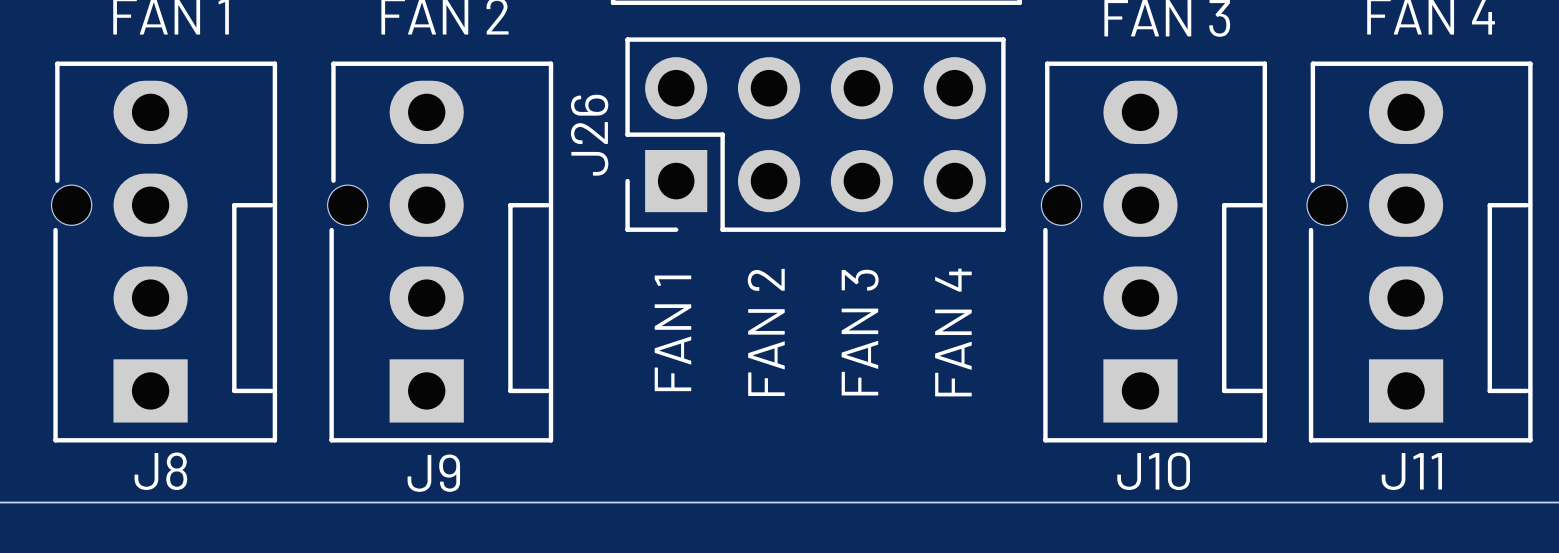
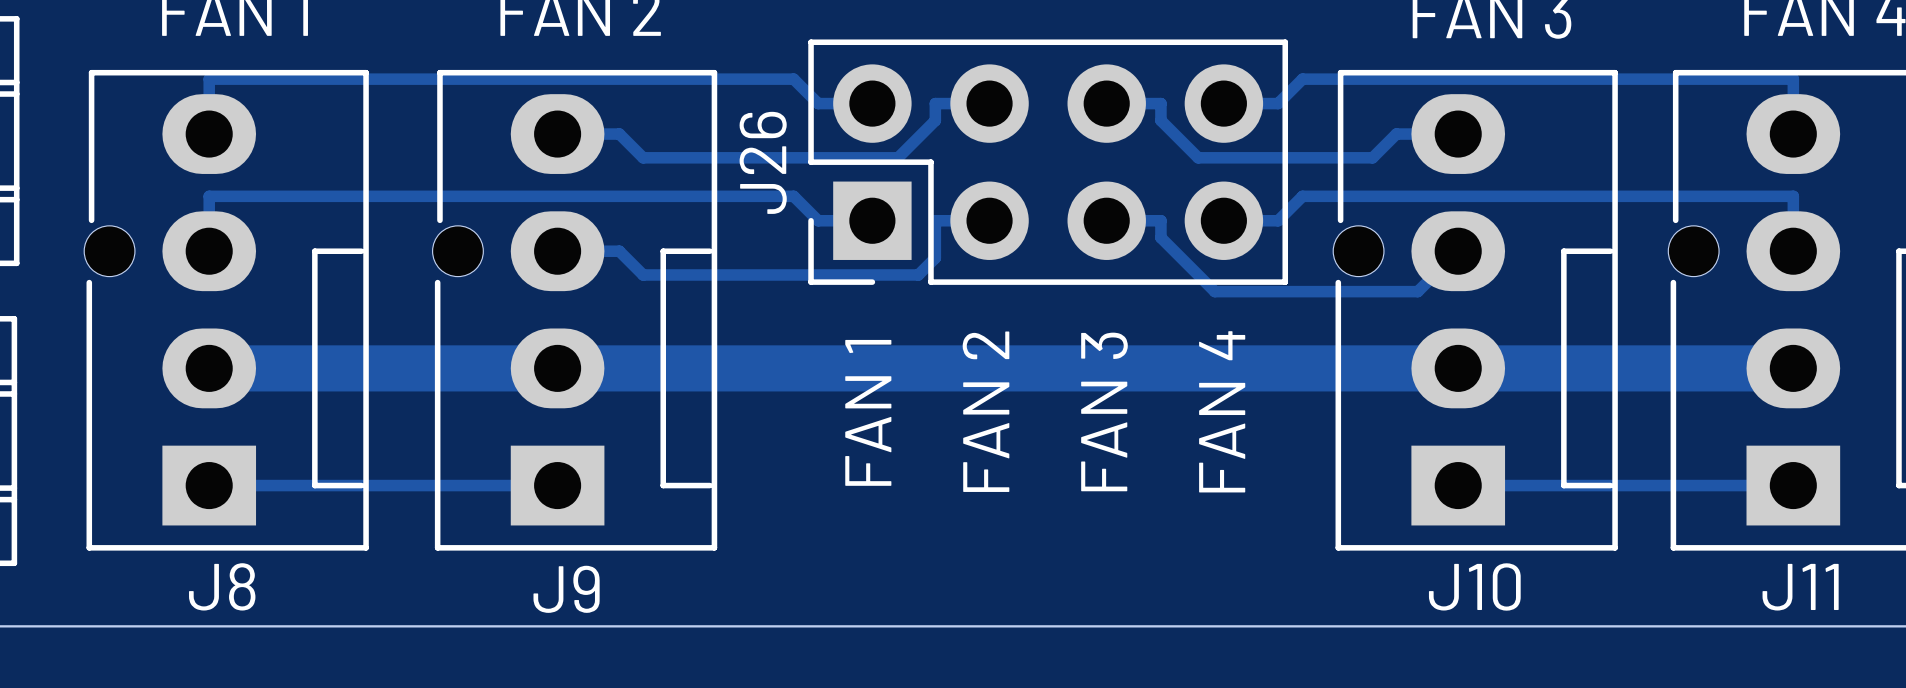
track: none -> (872, 103) (818, 103) (793, 79) (209, 79) (209, 134)
track: none -> (989, 103) (935, 103) (935, 120) (898, 157) (643, 157) (619, 134) (557, 134)
track: none -> (1106, 103) (1160, 103) (1160, 120) (1198, 157) (1372, 157) (1396, 134) (1458, 134)
track: none -> (1223, 103) (1278, 103) (1302, 79) (1793, 79) (1793, 134)
track: none -> (872, 220) (818, 220) (793, 196) (209, 196) (209, 251)
track: none -> (989, 220) (935, 220) (935, 258) (918, 274) (643, 274) (619, 251) (557, 251)
track: none -> (1106, 220) (1160, 220) (1160, 237) (1214, 291) (1417, 291) (1458, 251)
track: none -> (1223, 220) (1278, 220) (1302, 196) (1793, 196) (1793, 251)
track: none -> (209, 368) (1793, 368)
track: none -> (209, 485) (557, 485)
track: none -> (1458, 485) (1793, 485)

